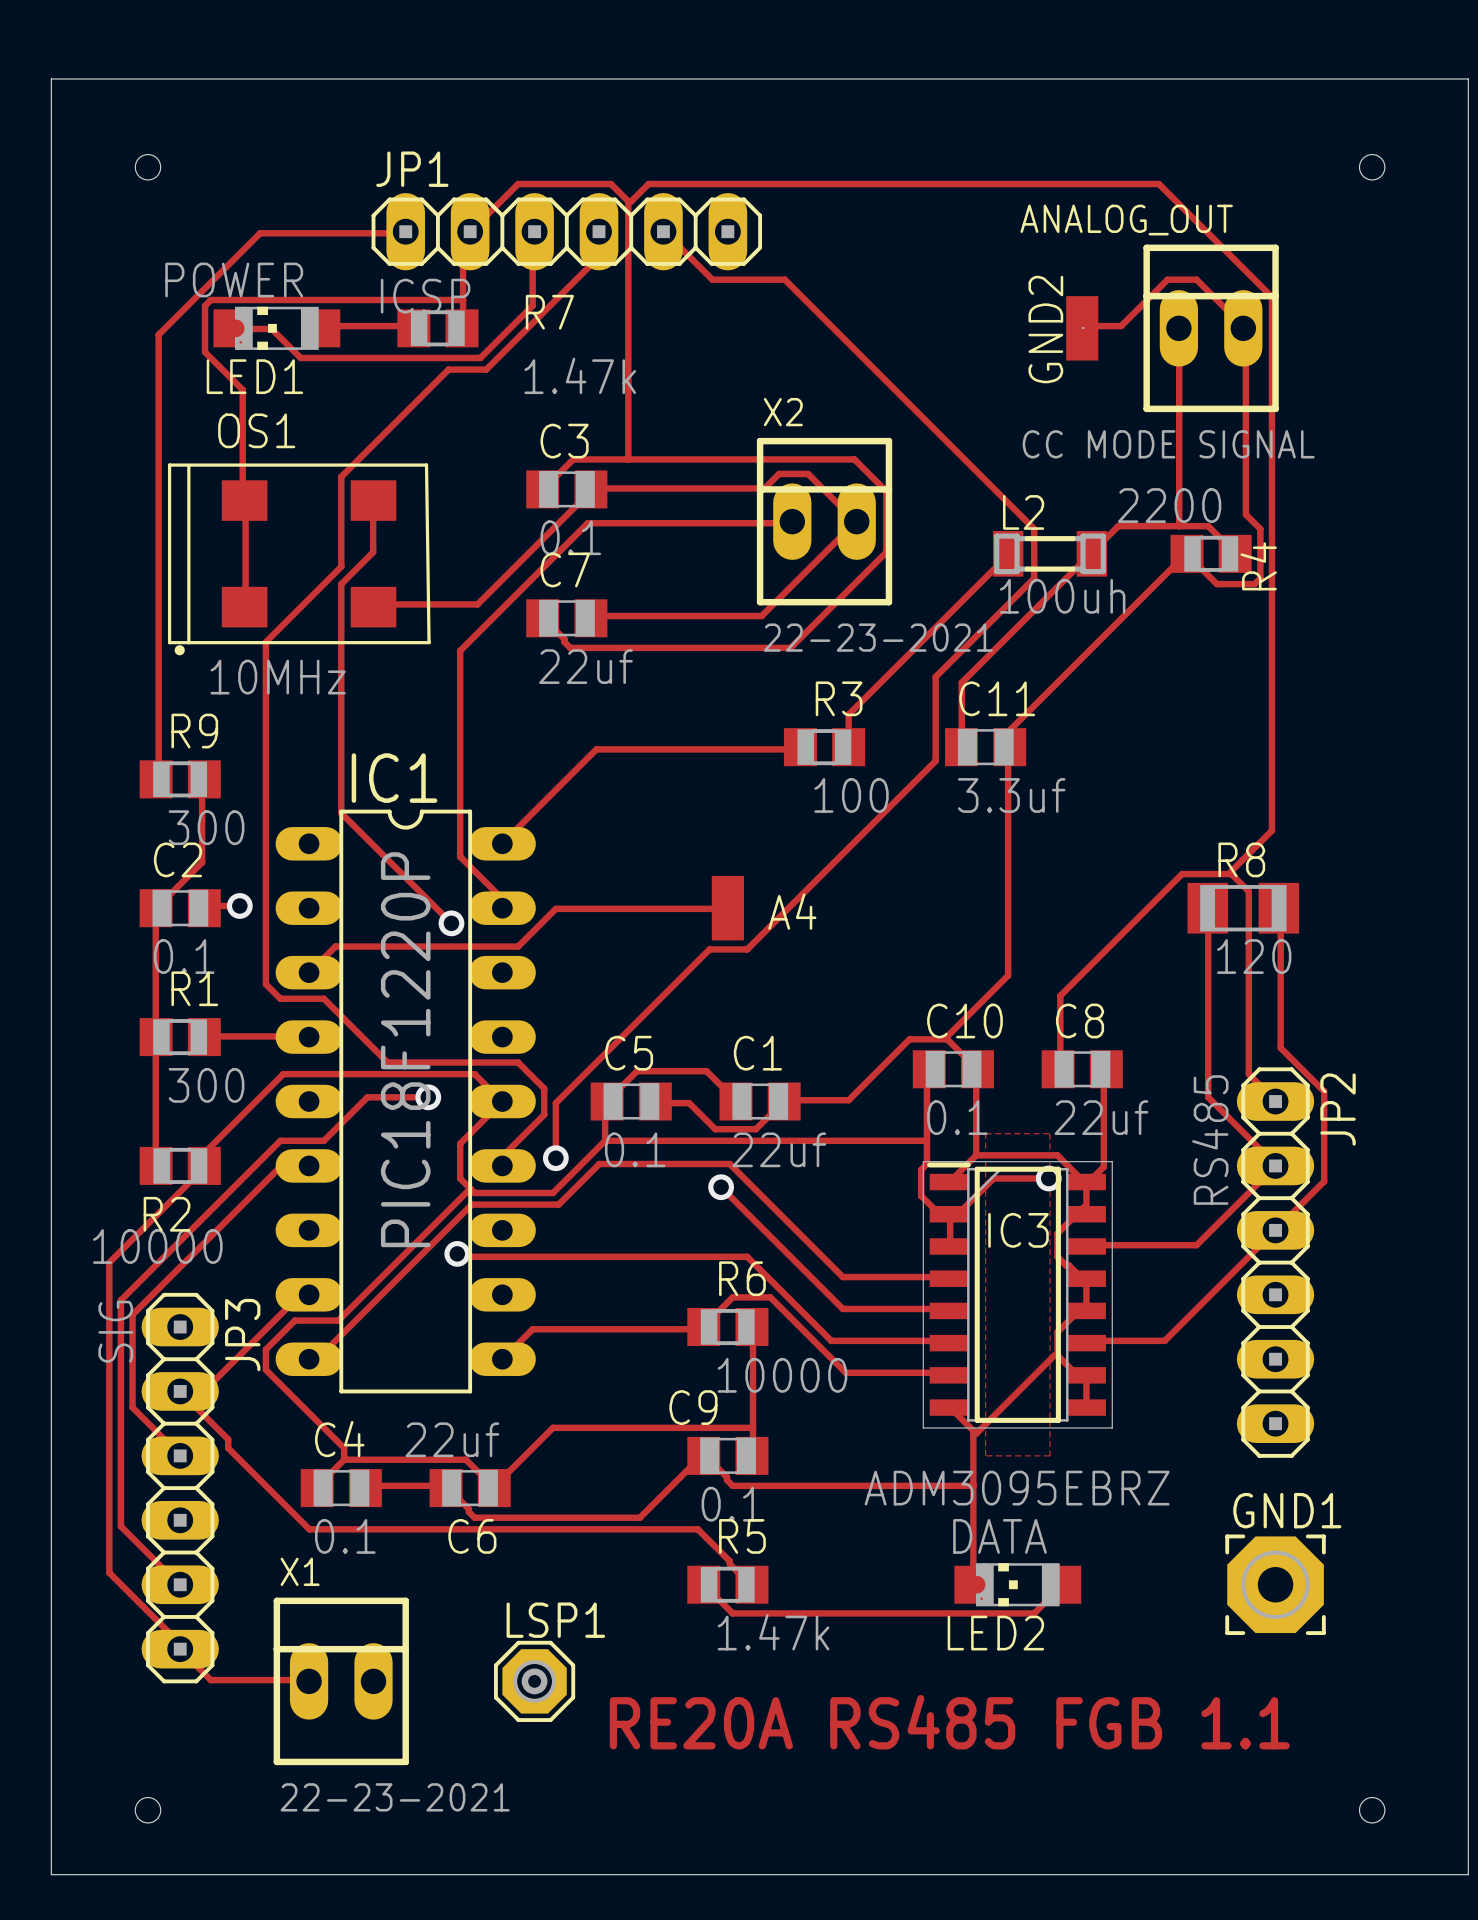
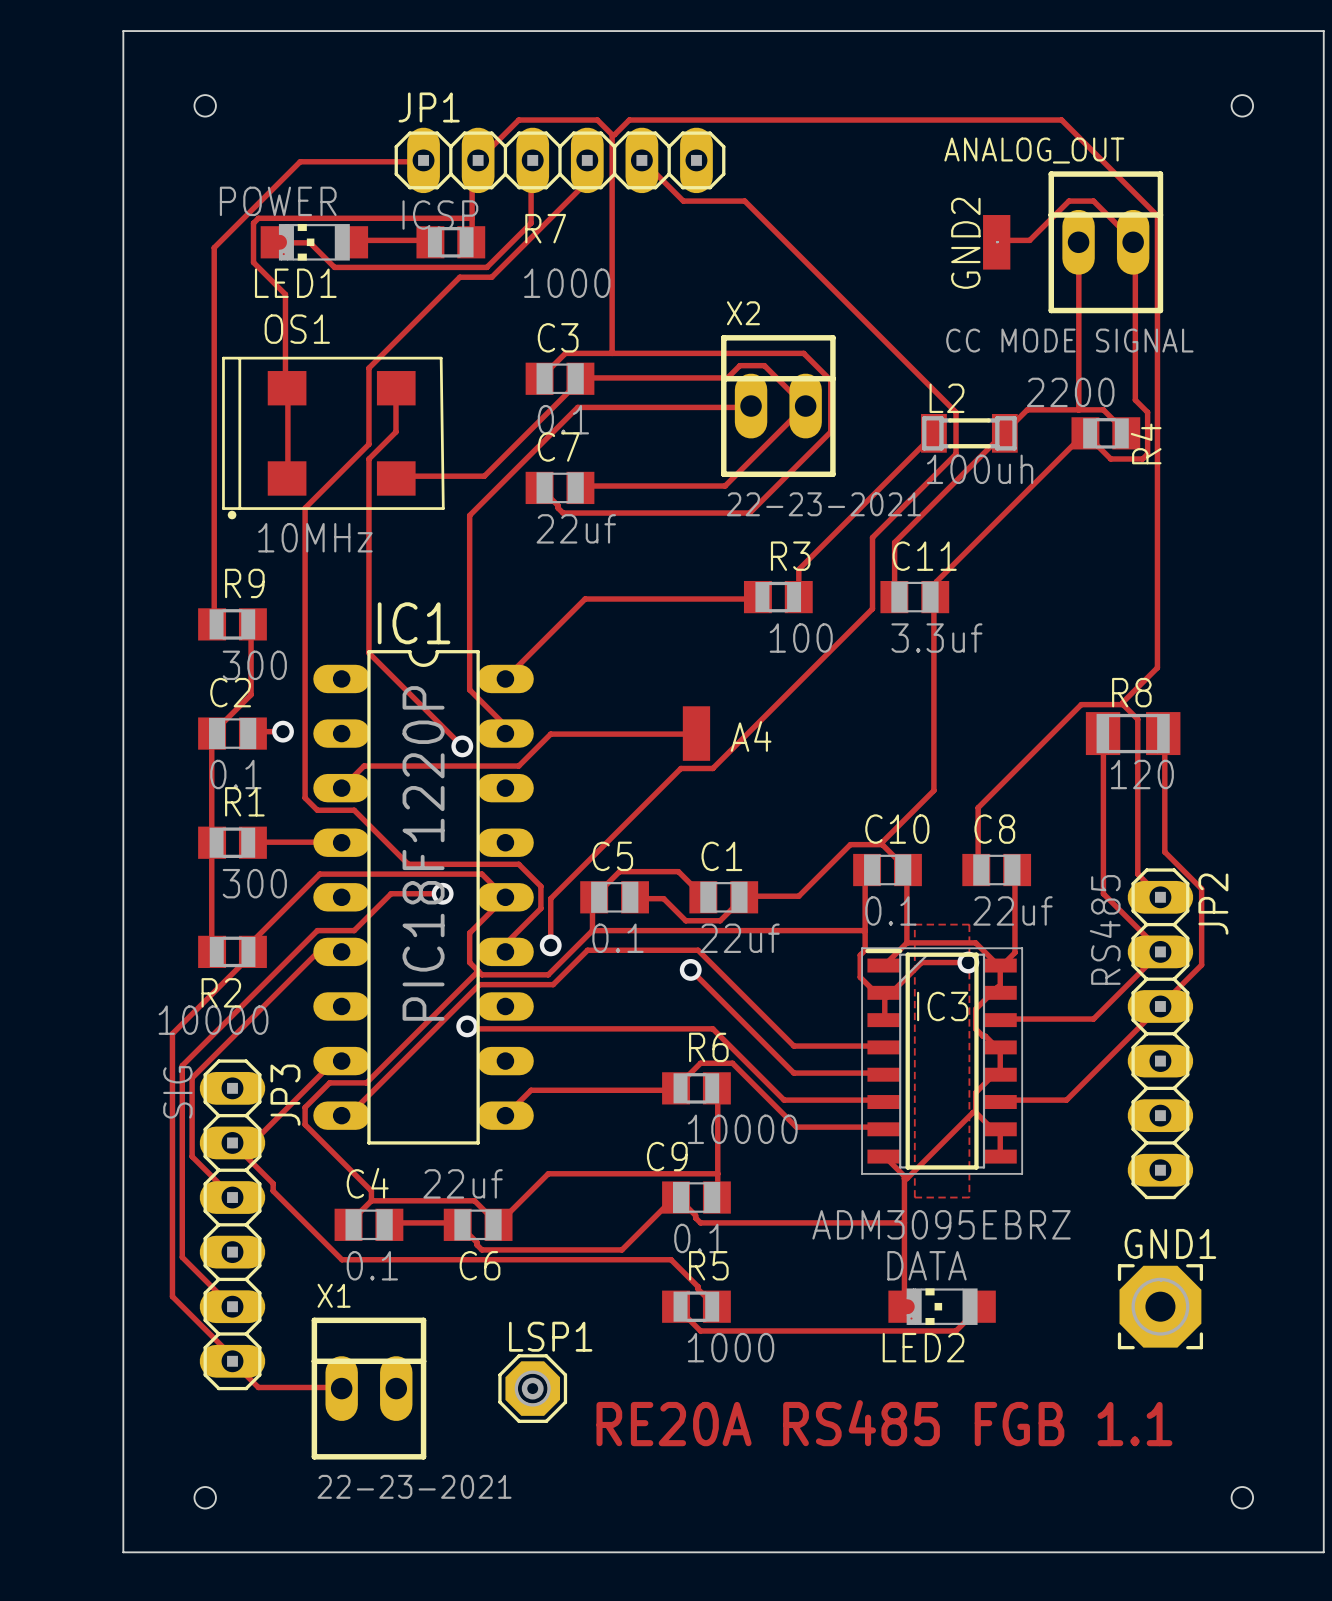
R7 value: 1.47k (580, 375) -> 1000 (567, 283)
R5 value: 1.47k (773, 1632) -> 1000 (731, 1347)

